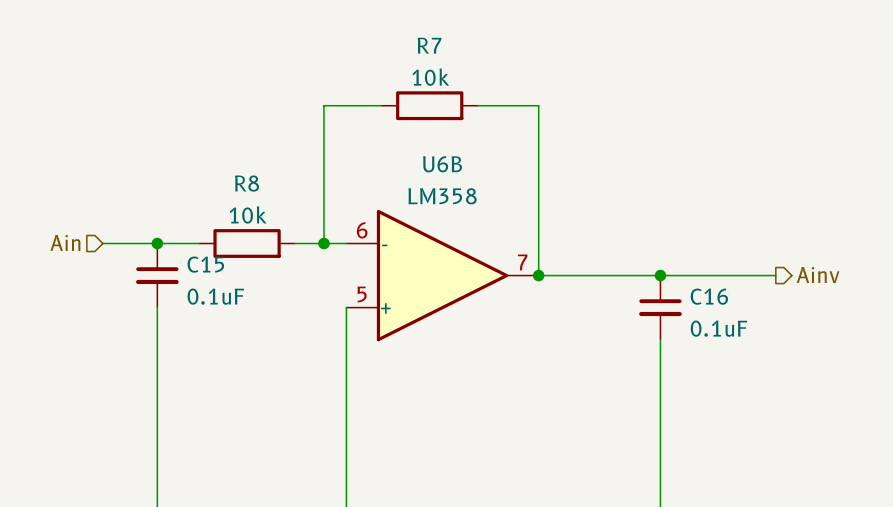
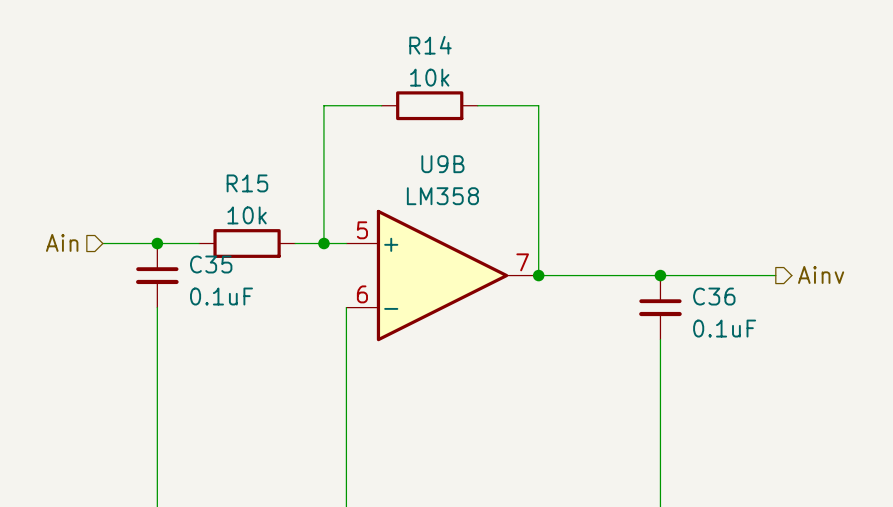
R7 name: R7 (429, 45) -> R14 (430, 45)
U6B name: U6B (442, 164) -> U9B (442, 164)
R8 name: R8 (247, 183) -> R15 (247, 183)
C15 name: C15 (205, 264) -> C35 (211, 264)
U6B flip: as is (442, 275) -> up-down (442, 275)
C16 name: C16 (709, 296) -> C36 (714, 296)

